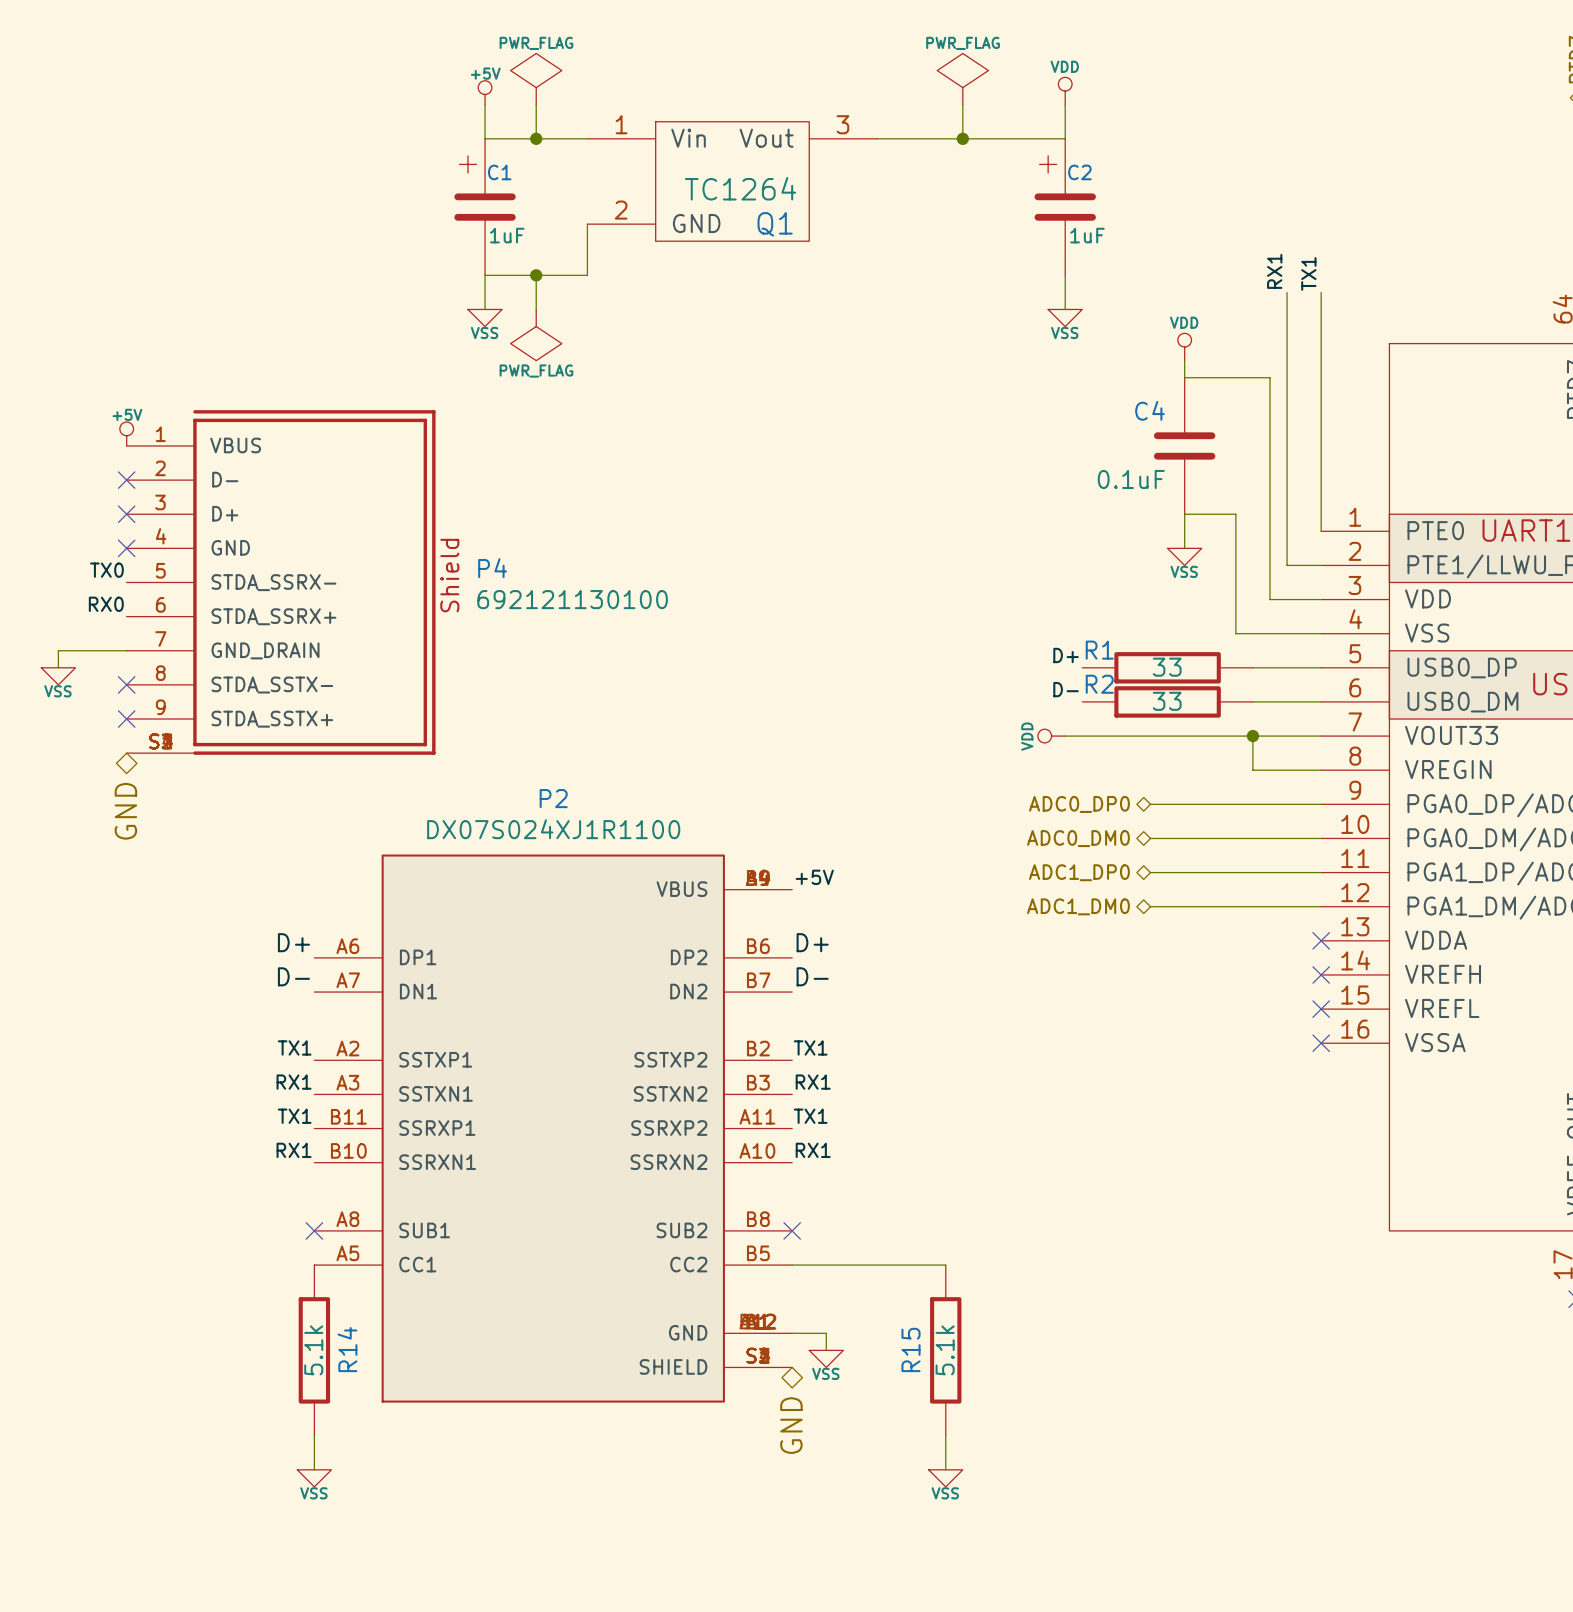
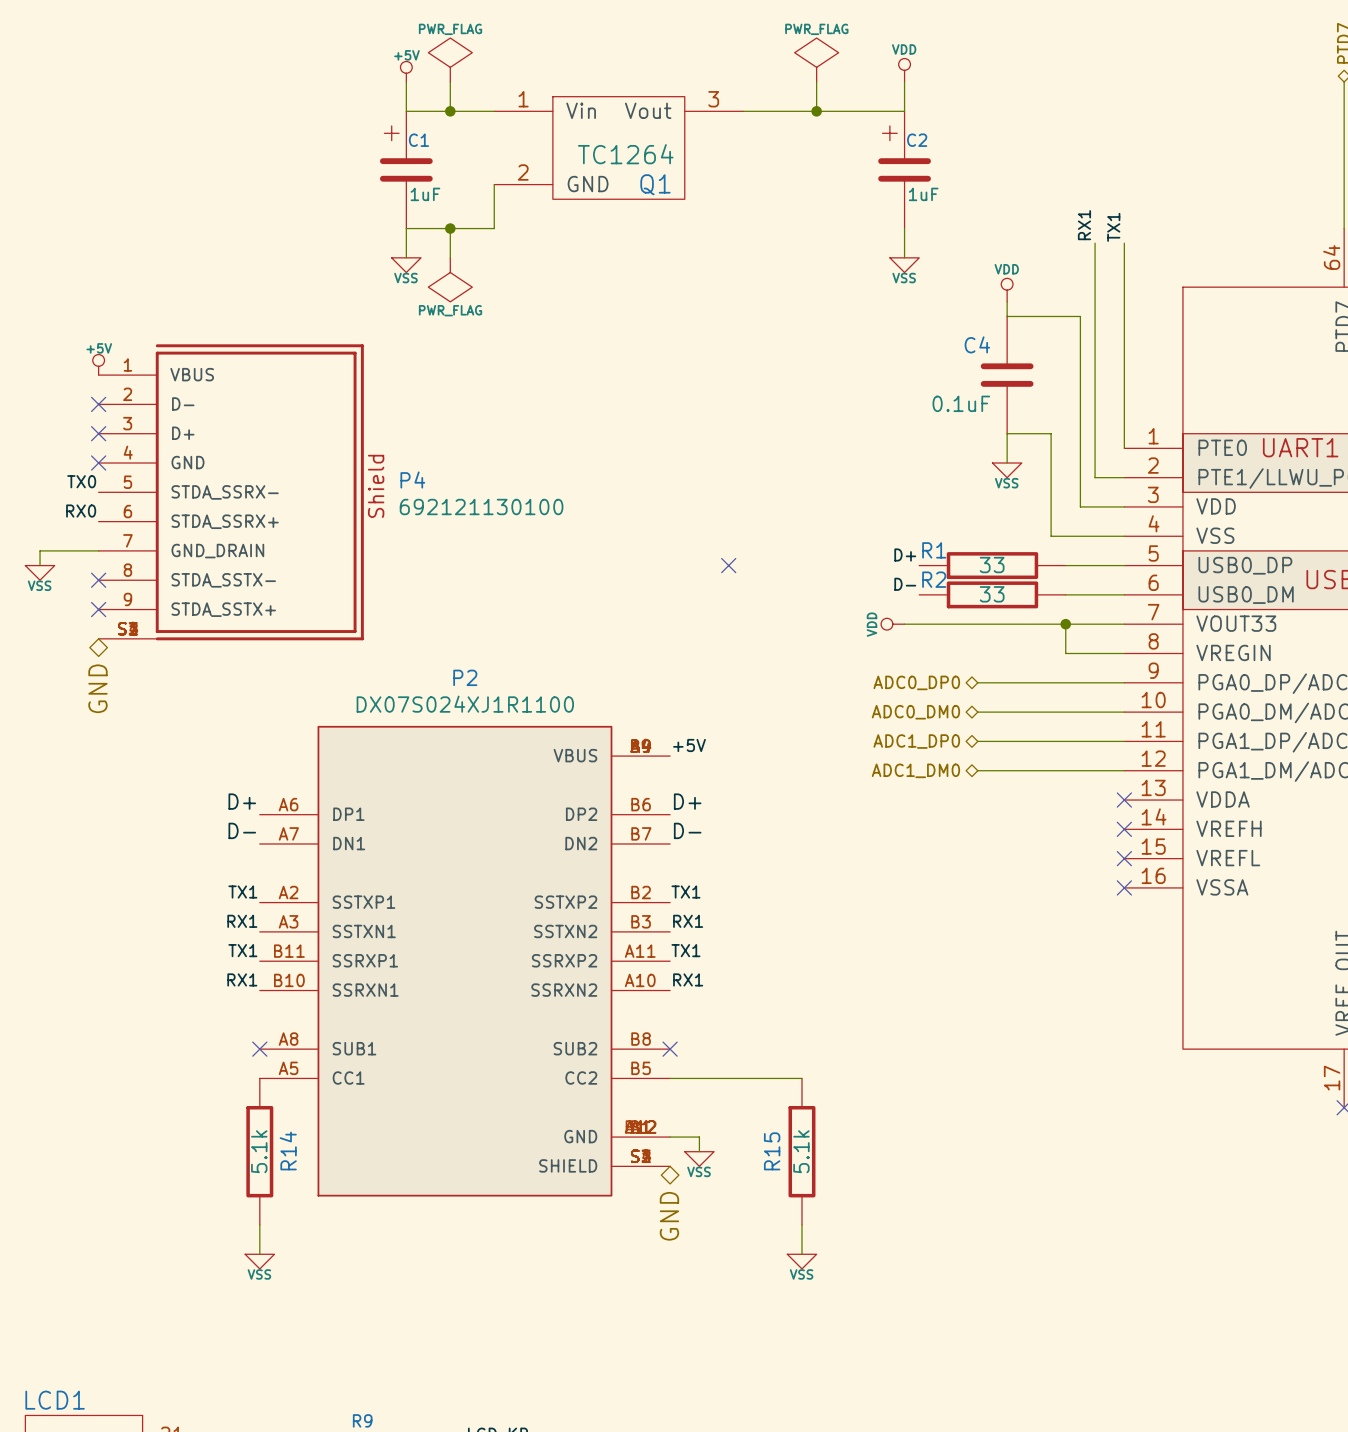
no-connect mark: none -> (728, 565)

